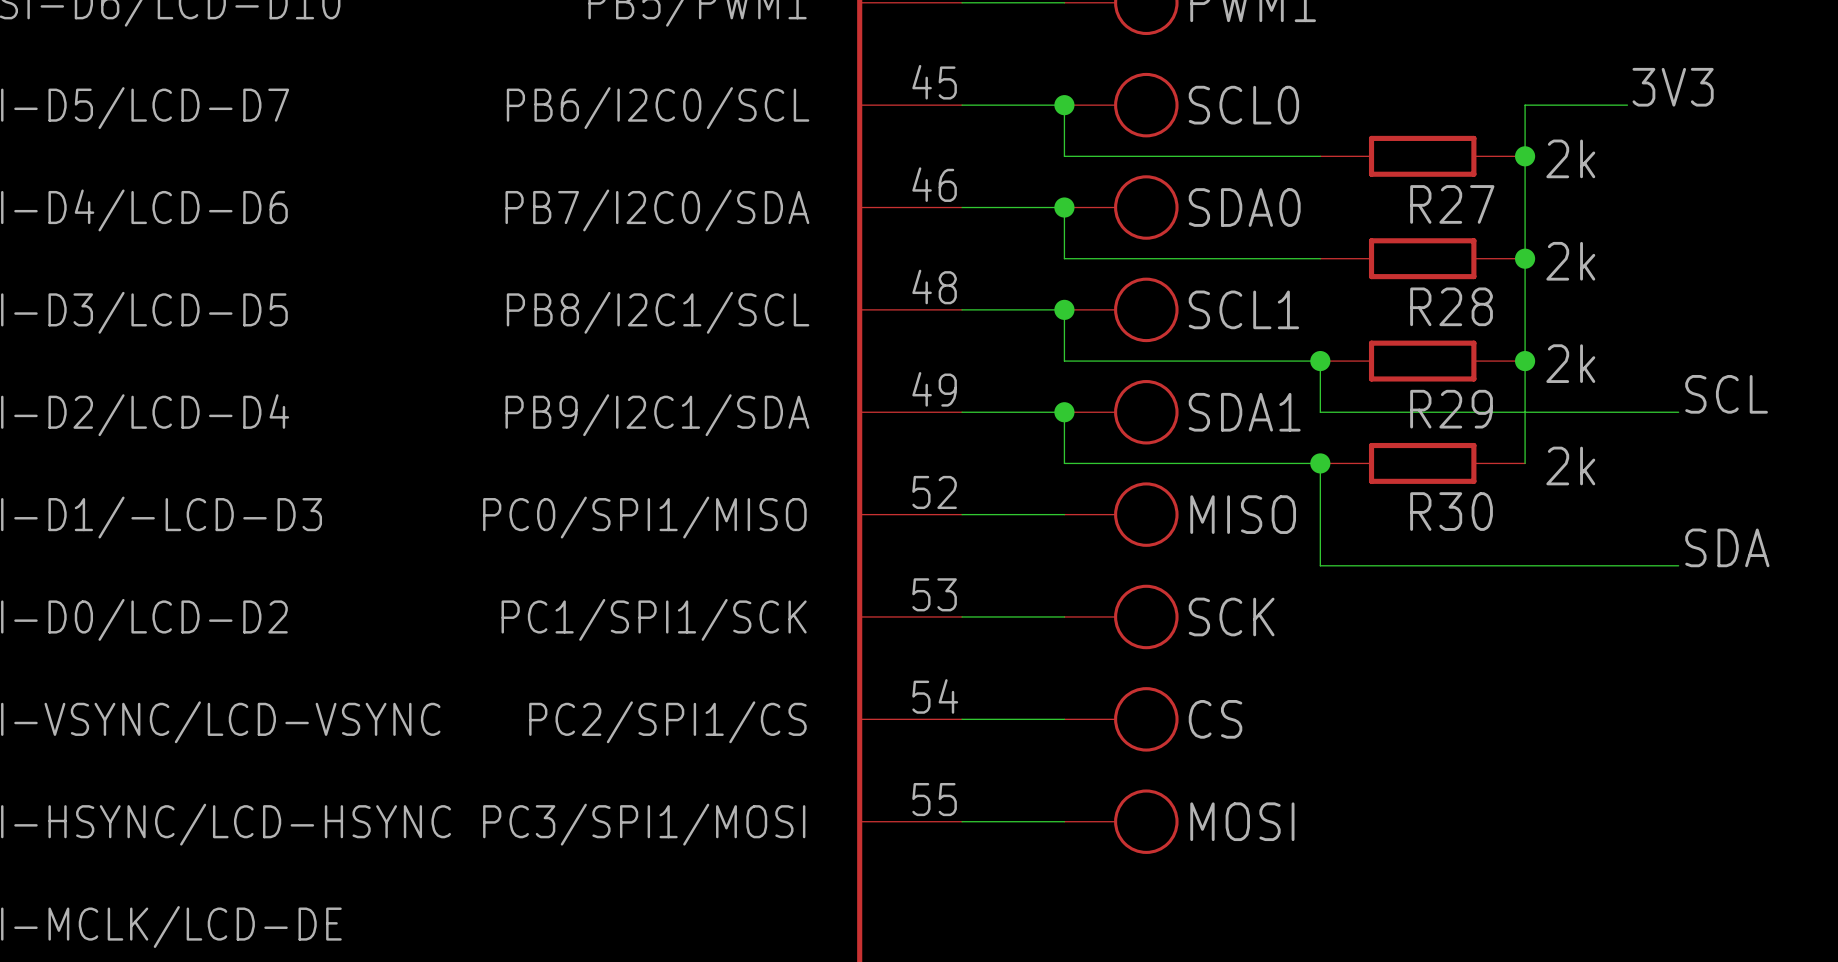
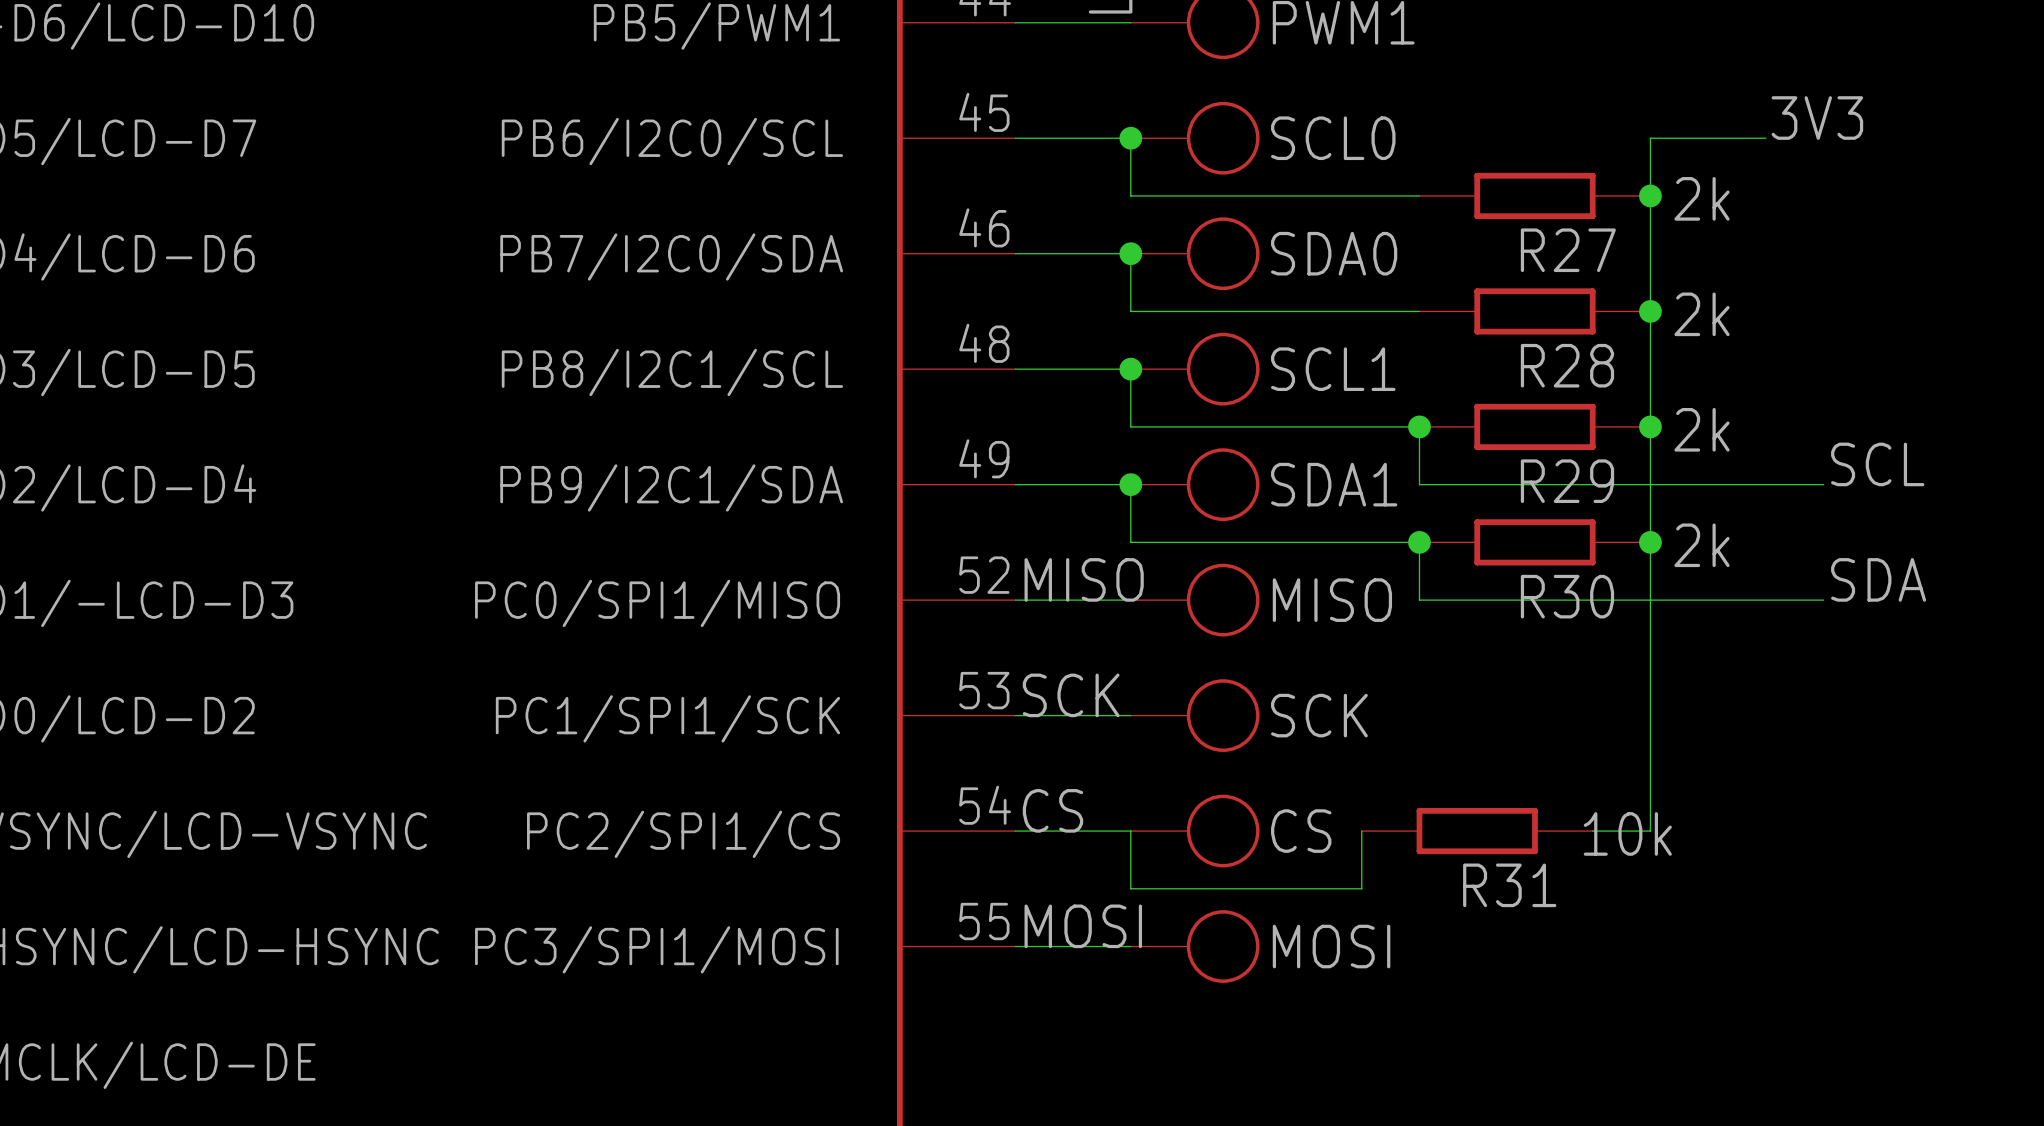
wire: none -> (1650, 542) (1650, 831) (1592, 831)
junction: none -> (1650, 542)
label: none -> MISO (1084, 579)
wire: (1320, 514) (1320, 565) (1678, 565) -> (1419, 600) (1823, 600)
label position: SDA (1727, 547) -> SDA (1878, 579)
label: none -> SCK (1071, 695)
label: none -> CS (1052, 810)
wire: none -> (1130, 831) (1130, 888) (1361, 888) (1361, 831)
R31: none -> 10k (1477, 831)
label: none -> MOSI (1083, 926)

